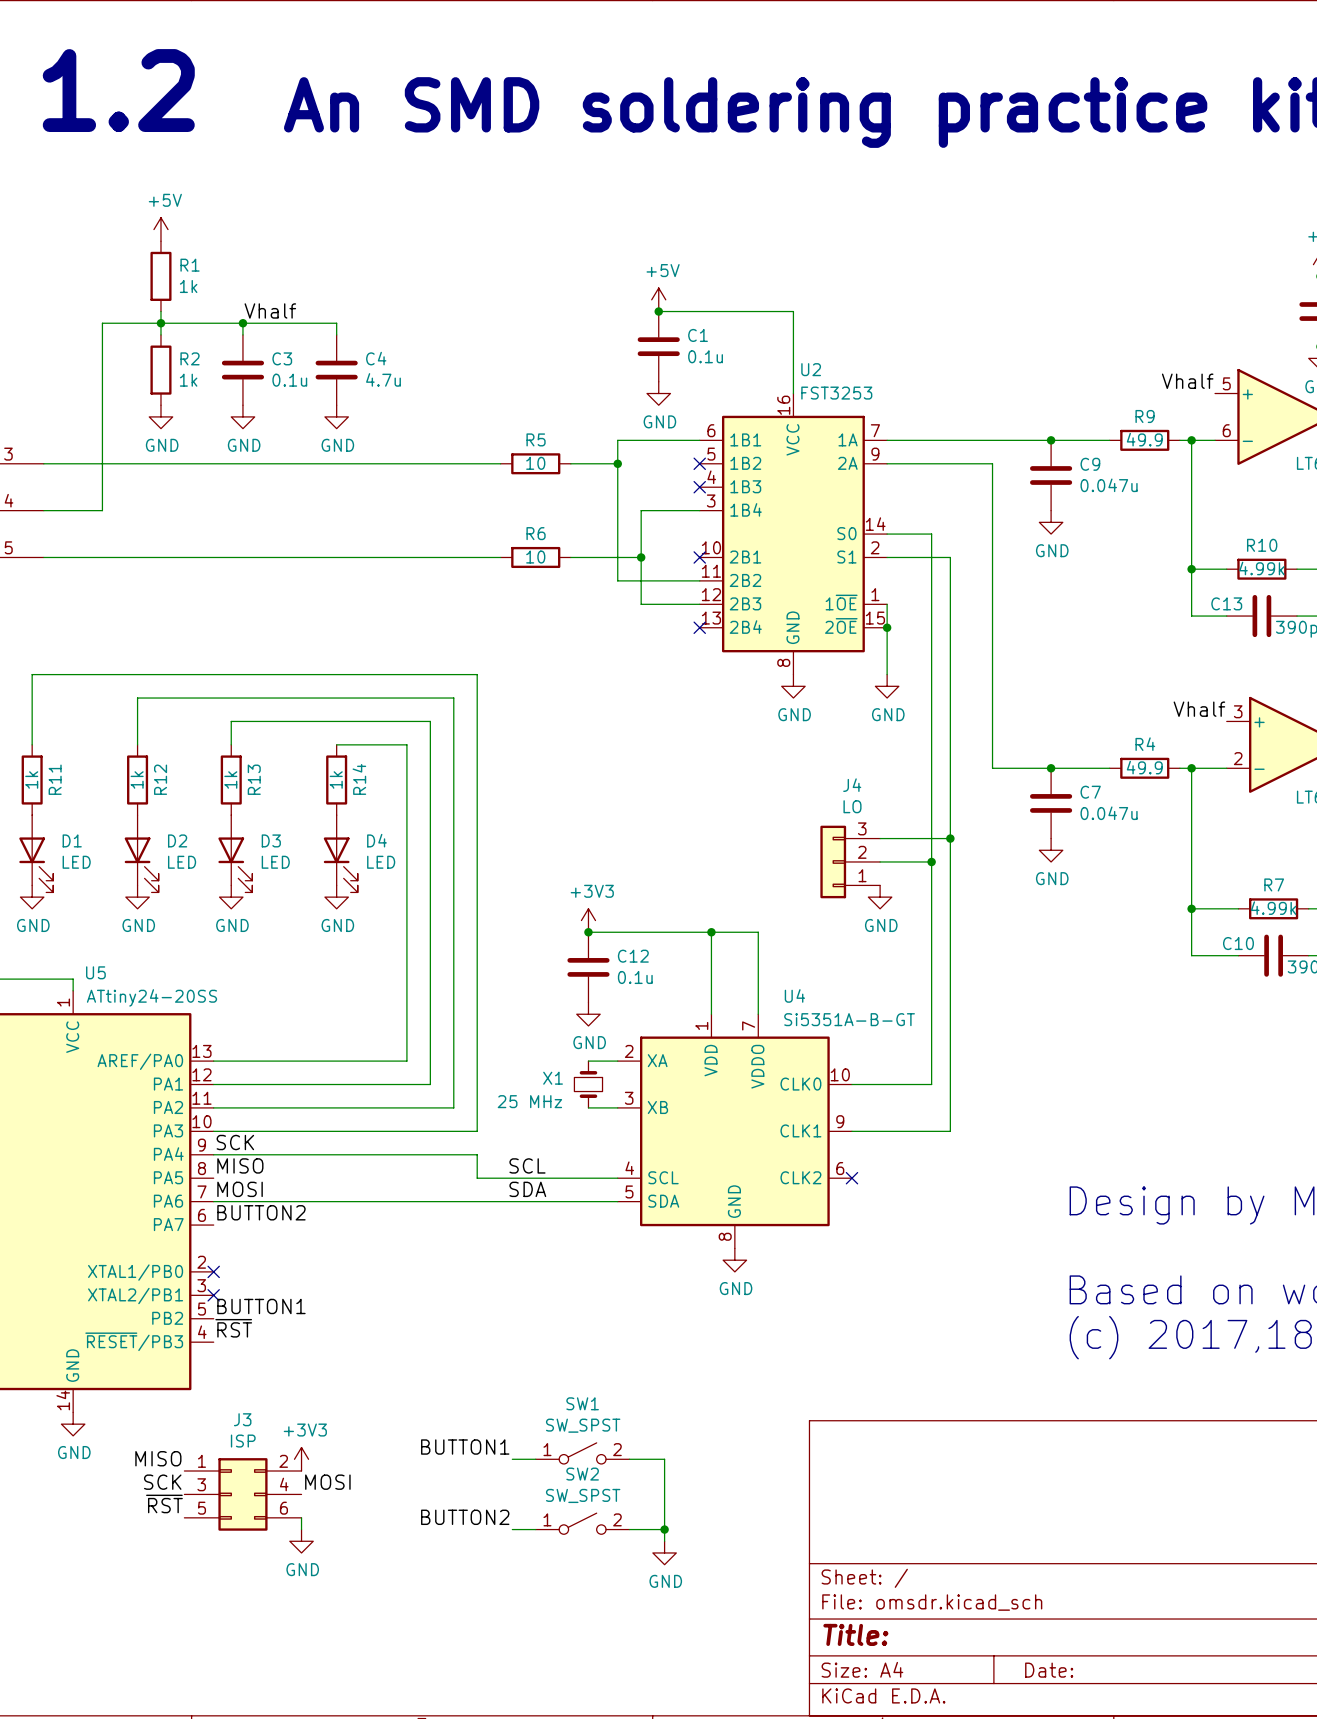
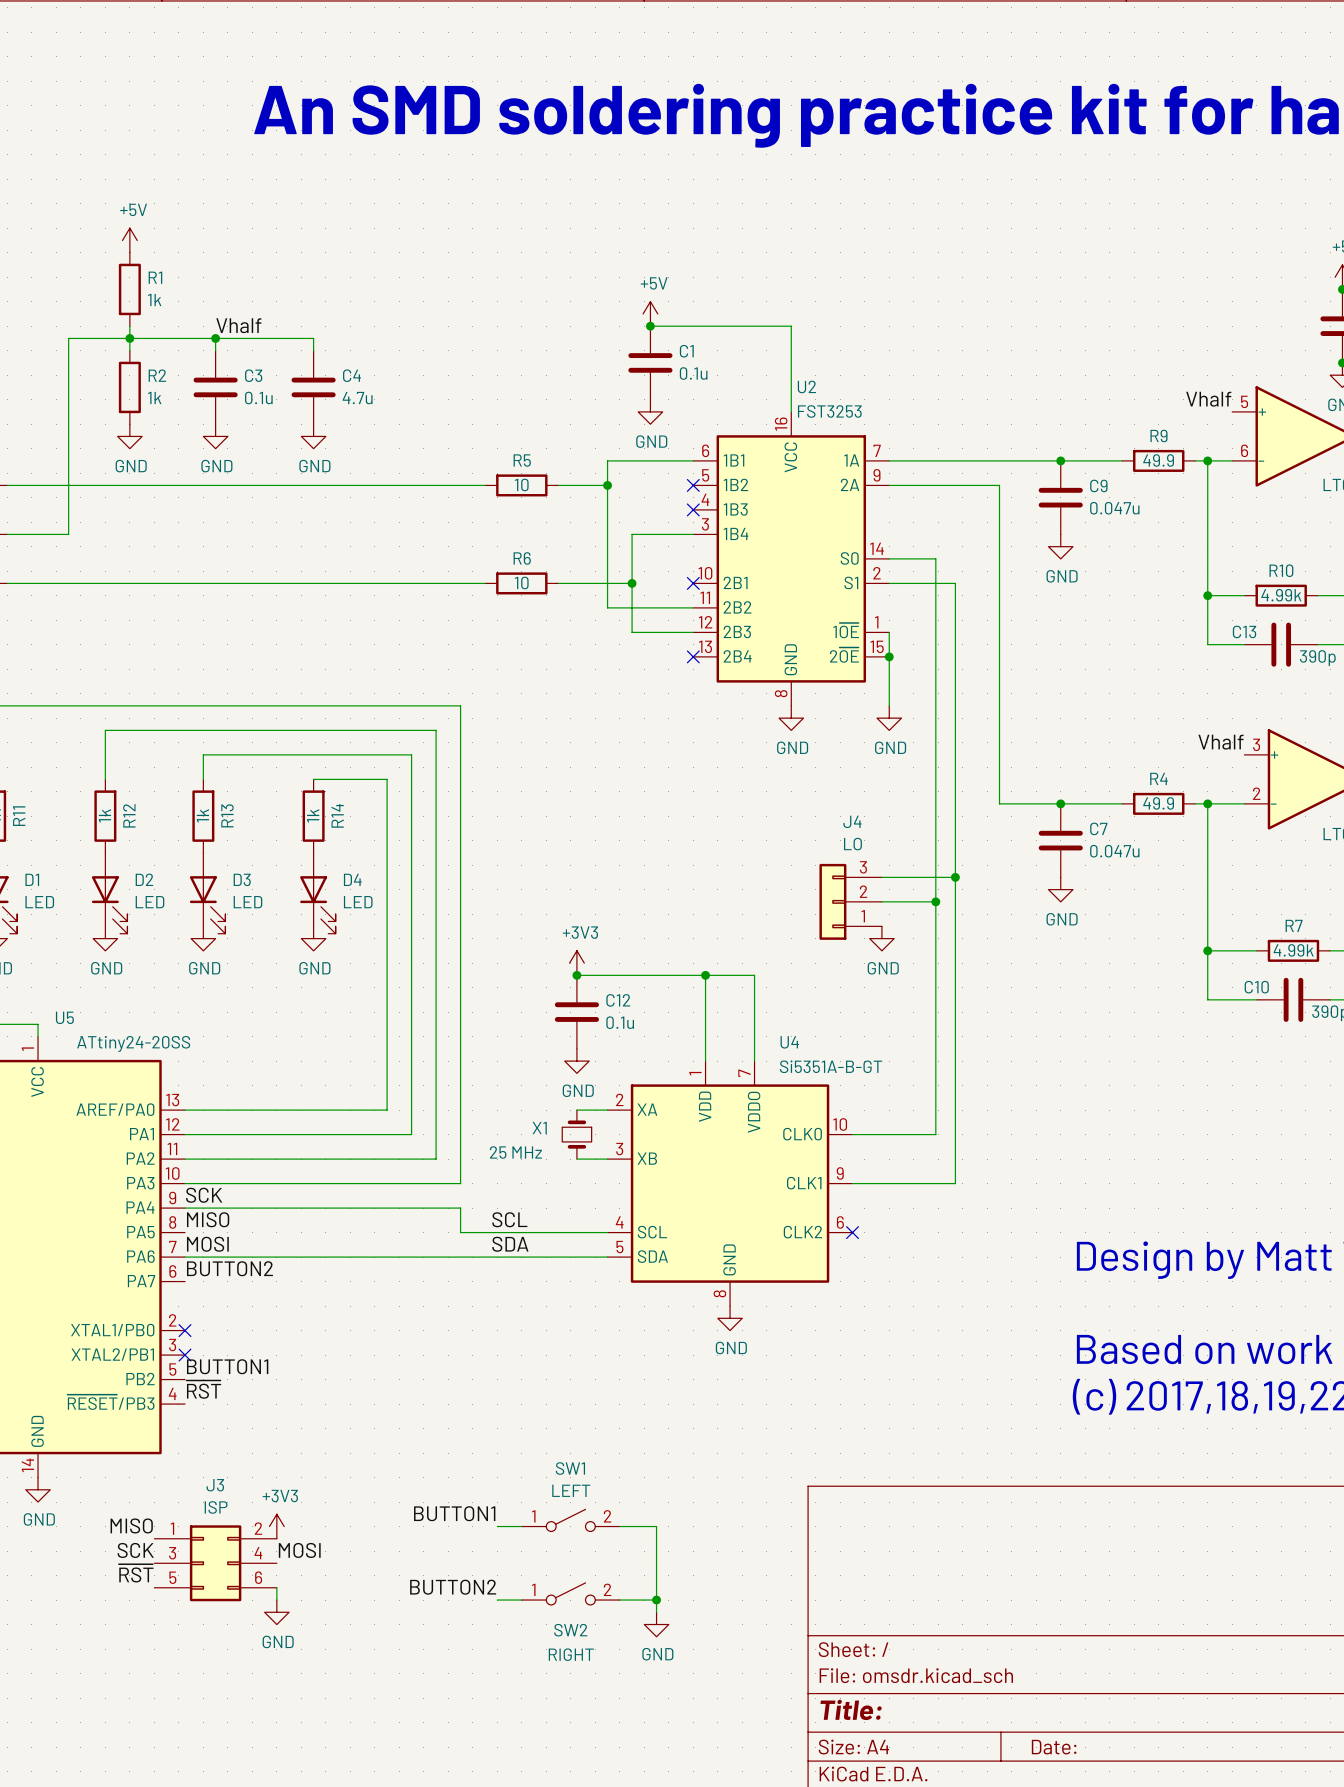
SW1 value: SW_SPST (583, 1425) -> LEFT (571, 1490)
SW2 name position: SW2 (582, 1474) -> SW2 (570, 1630)
SW2 value: SW_SPST (583, 1495) -> RIGHT (571, 1654)

